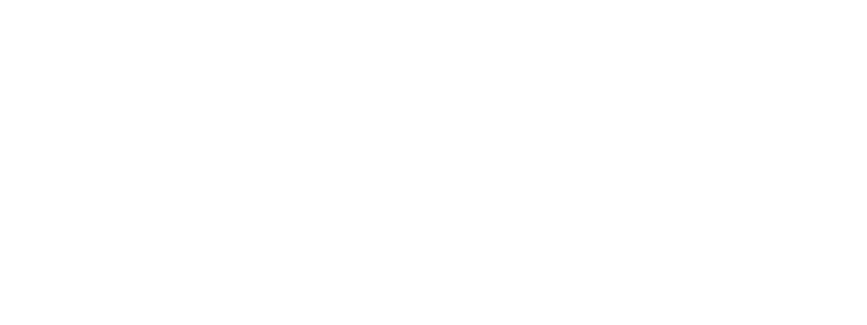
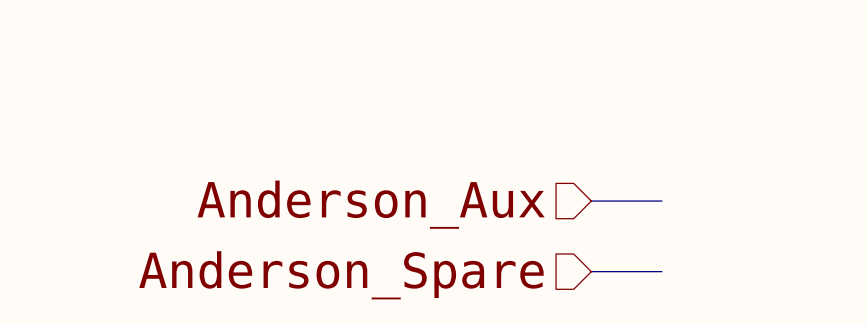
hierarchical label: none -> Anderson_Aux (371, 204)
wire: none -> (591, 201) (661, 201)
wire: none -> (591, 271) (661, 271)
hierarchical label: none -> Anderson_Spare (341, 275)

